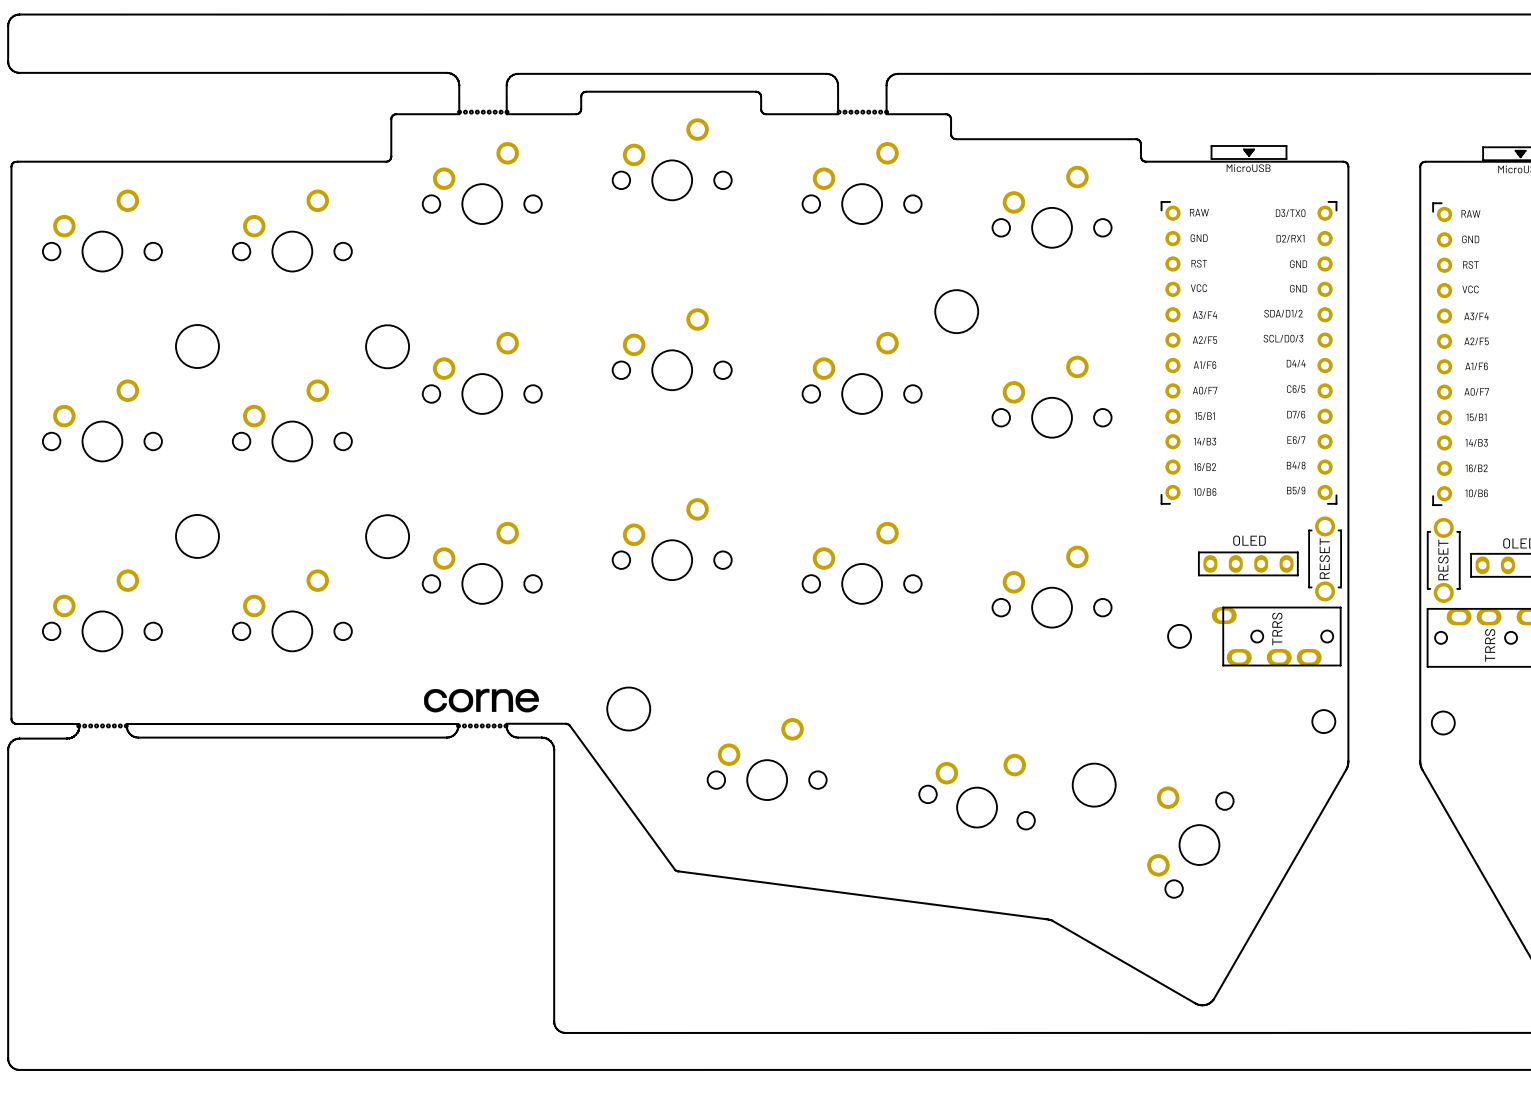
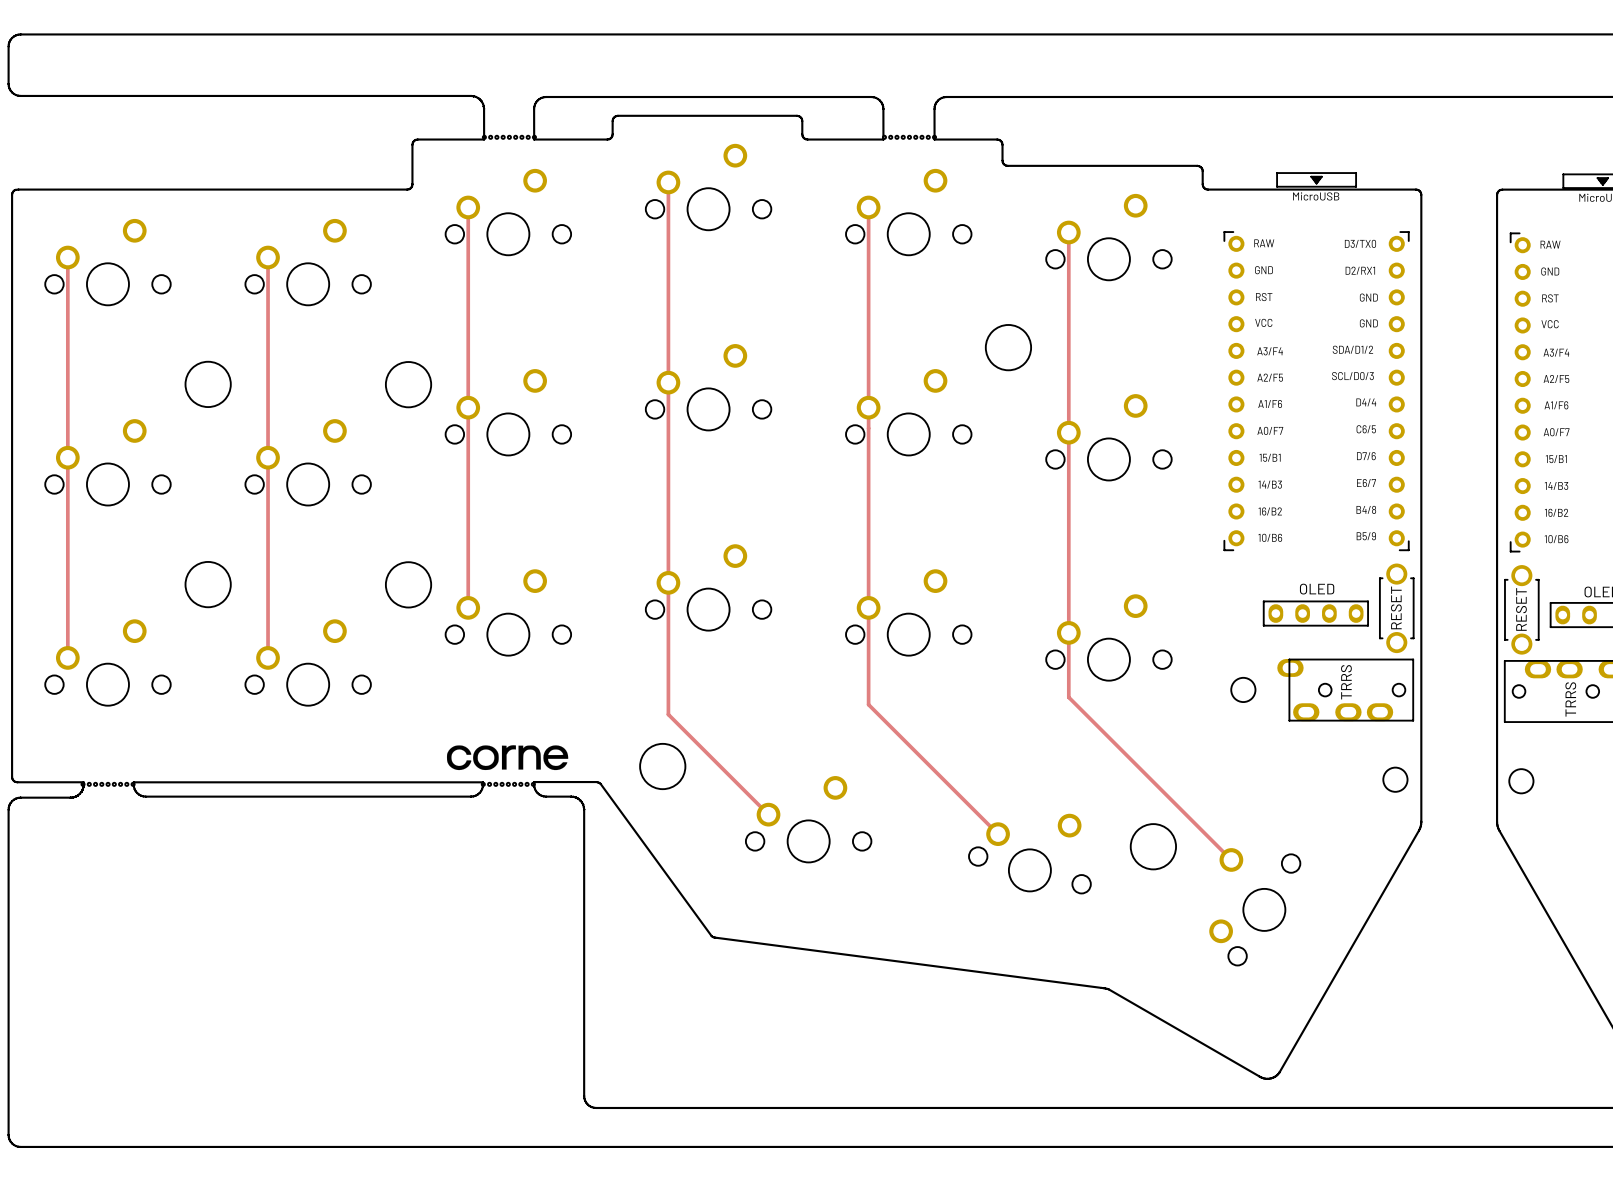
track: none -> (668, 182) (668, 714) (768, 814)
track: none -> (468, 207) (468, 607)
track: none -> (868, 207) (868, 704) (998, 834)
track: none -> (1068, 232) (1068, 697) (1231, 859)
track: none -> (67, 257) (67, 657)
track: none -> (268, 257) (268, 657)

